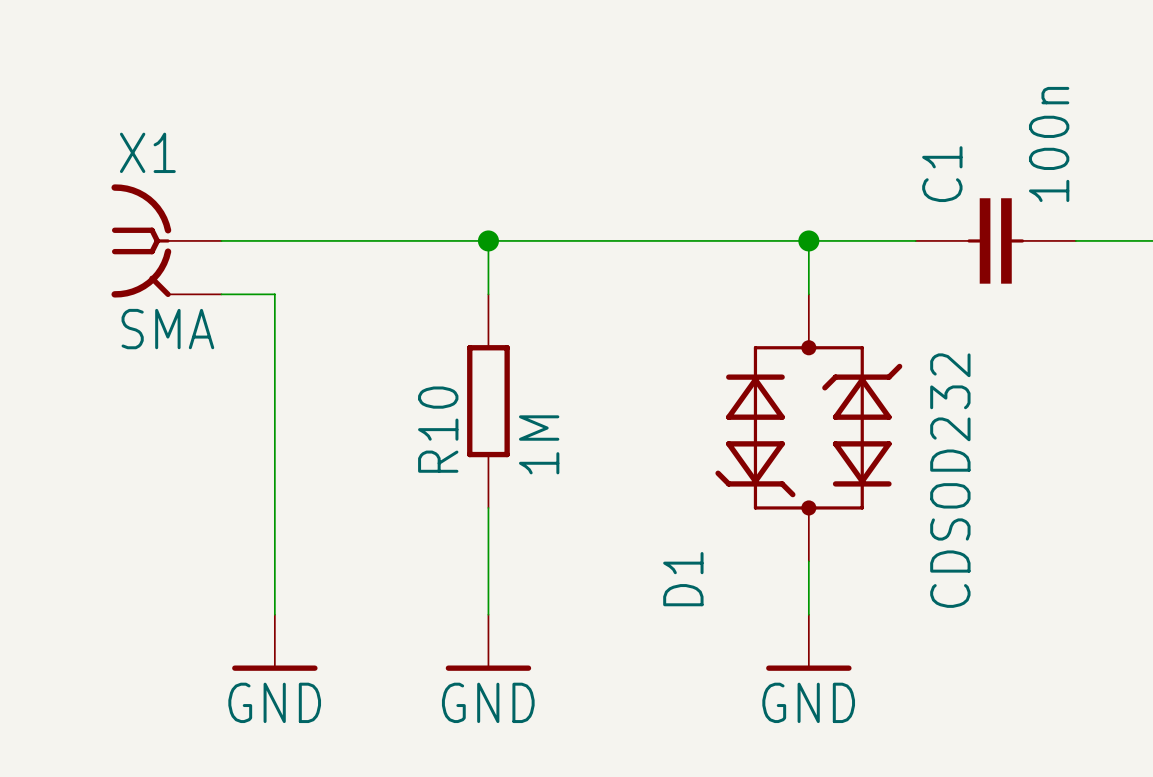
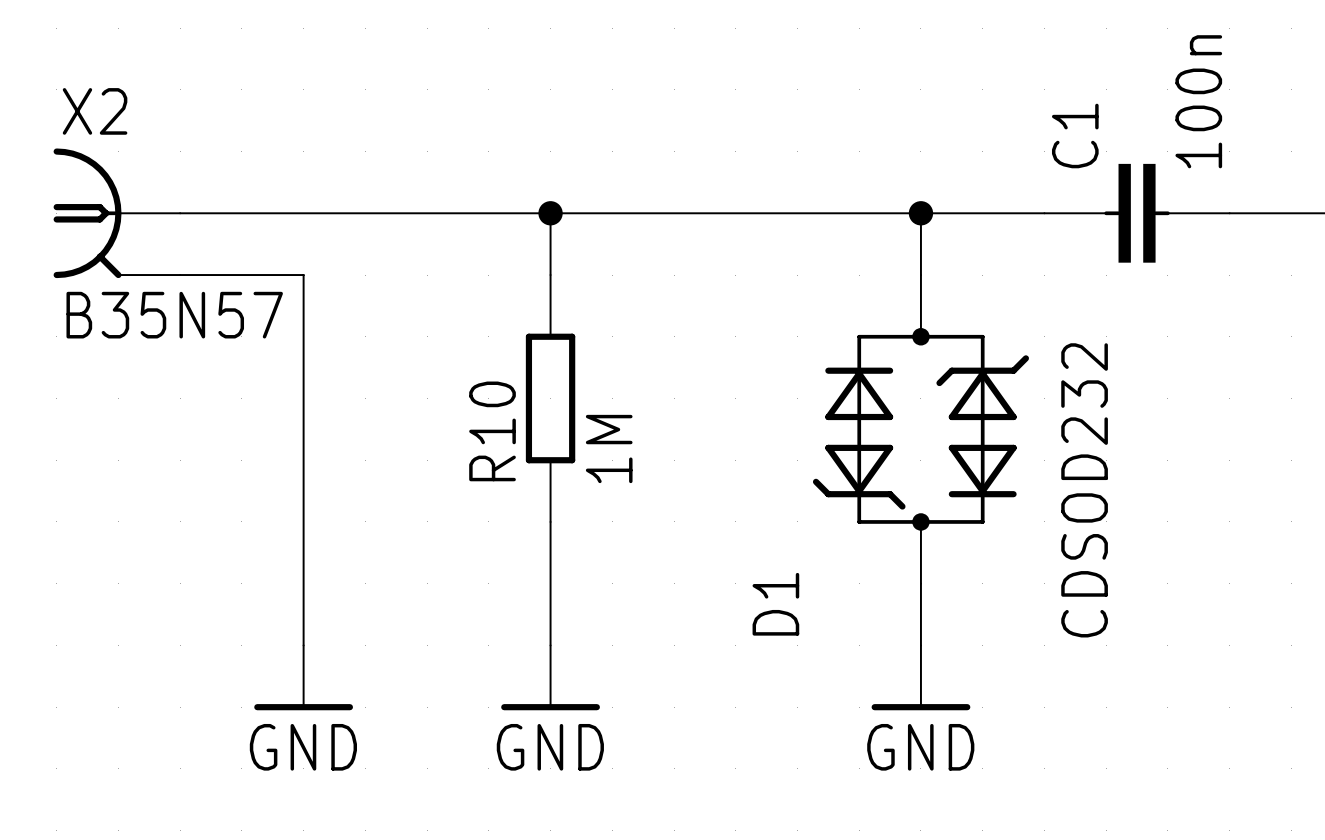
X2: none -> B35N57 (116, 213)
X1: SMA (166, 240) -> none

